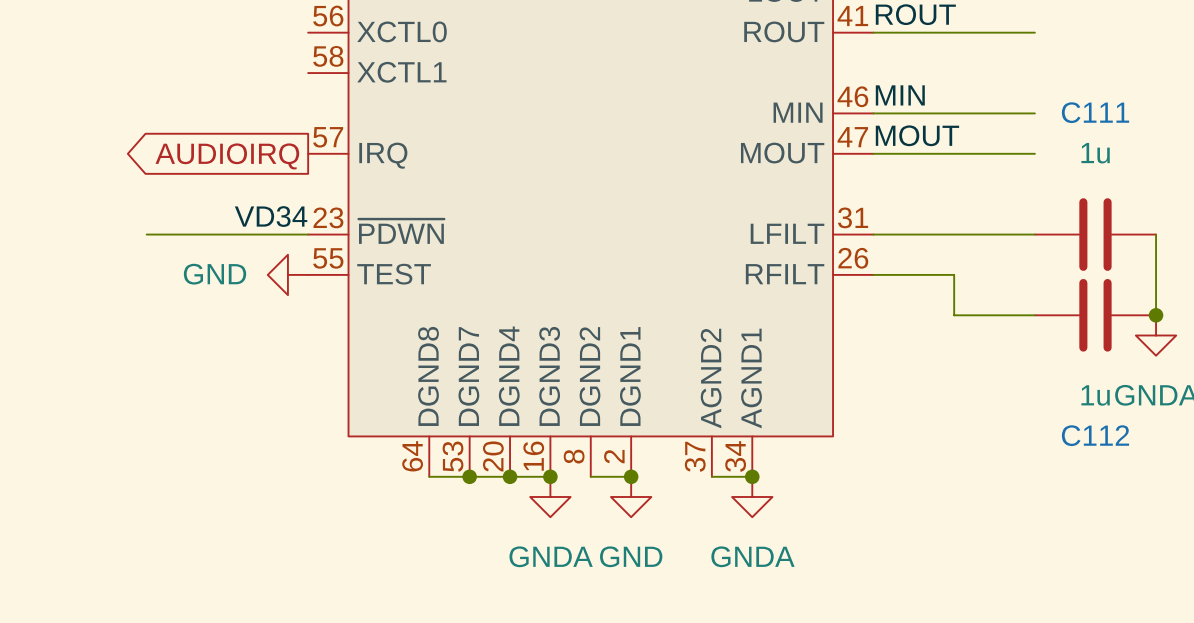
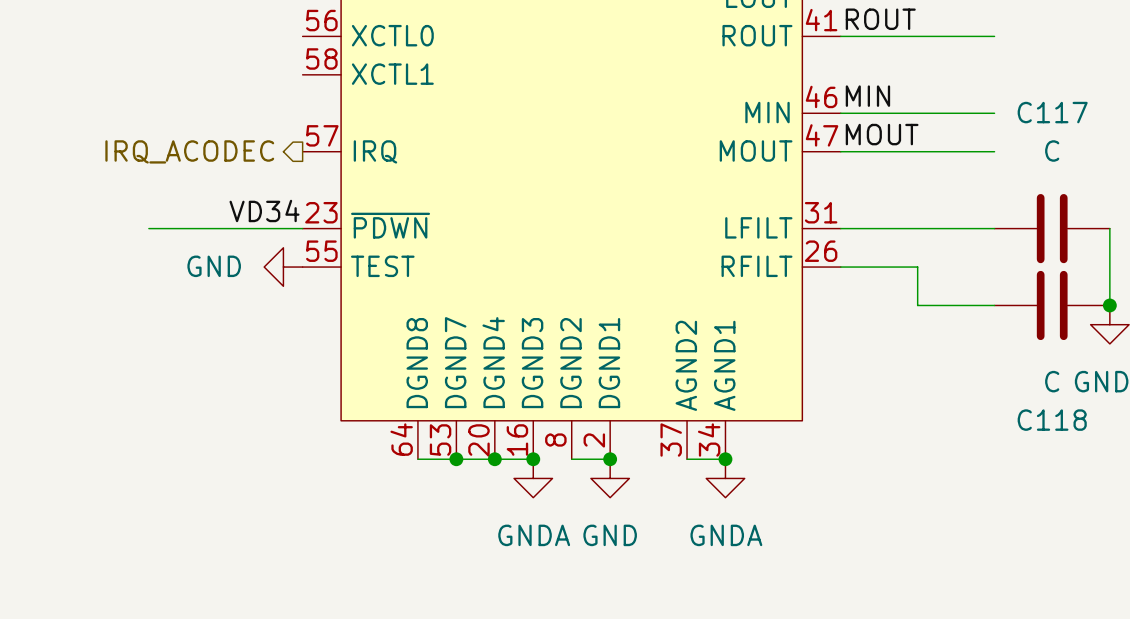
C111 name: C111 (1095, 112) -> C117 (1052, 112)
C111 value: 1u (1095, 153) -> C (1052, 151)
hierarchical label: none -> IRQ_ACODEC (189, 151)
global label: AUDIOIRQ (227, 156) -> none
C112 value: 1u (1095, 395) -> C (1052, 381)
C112 name: C112 (1095, 435) -> C118 (1052, 420)

